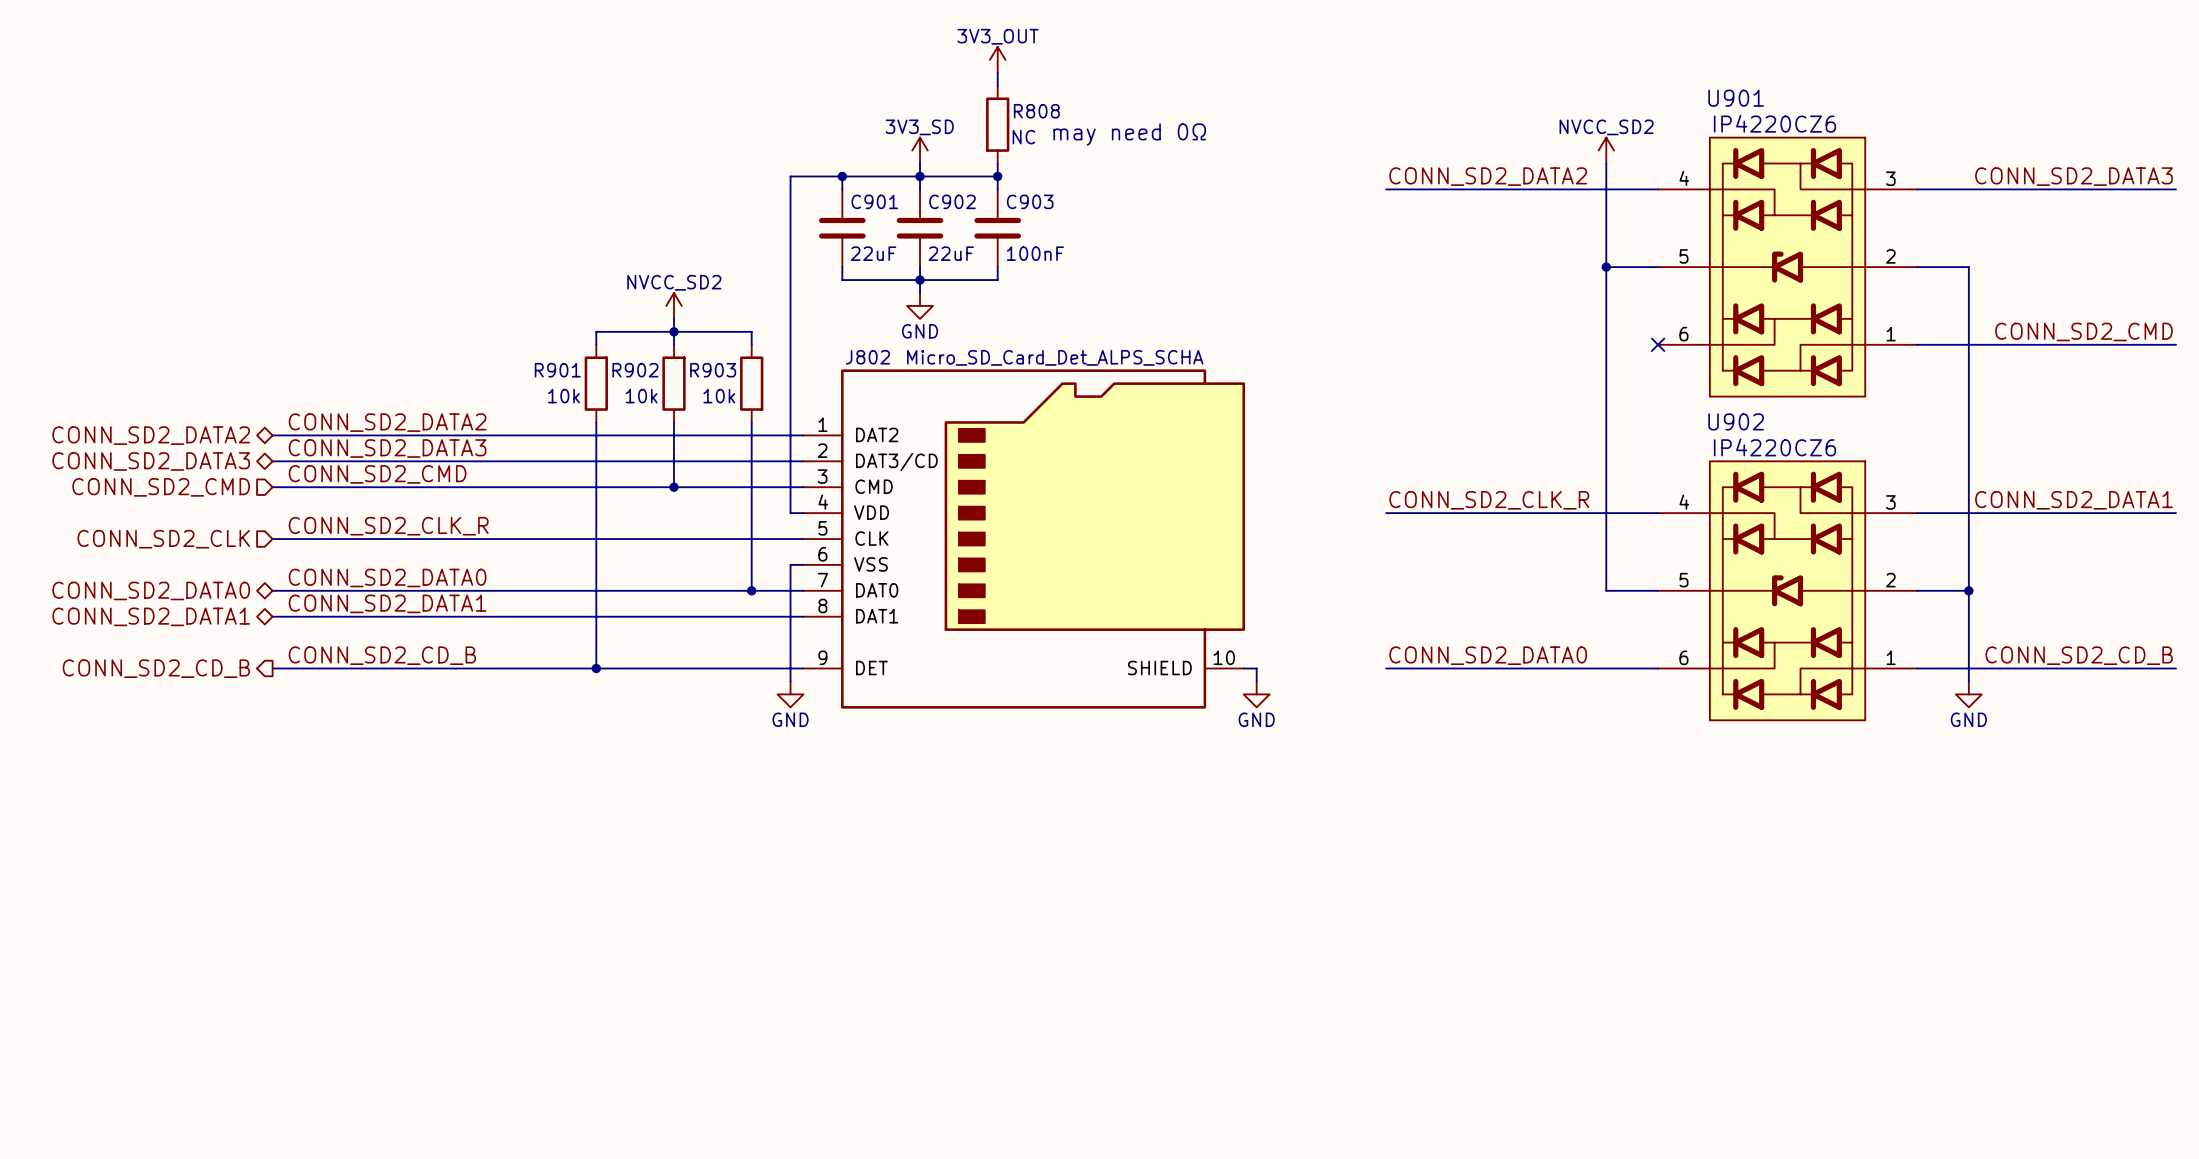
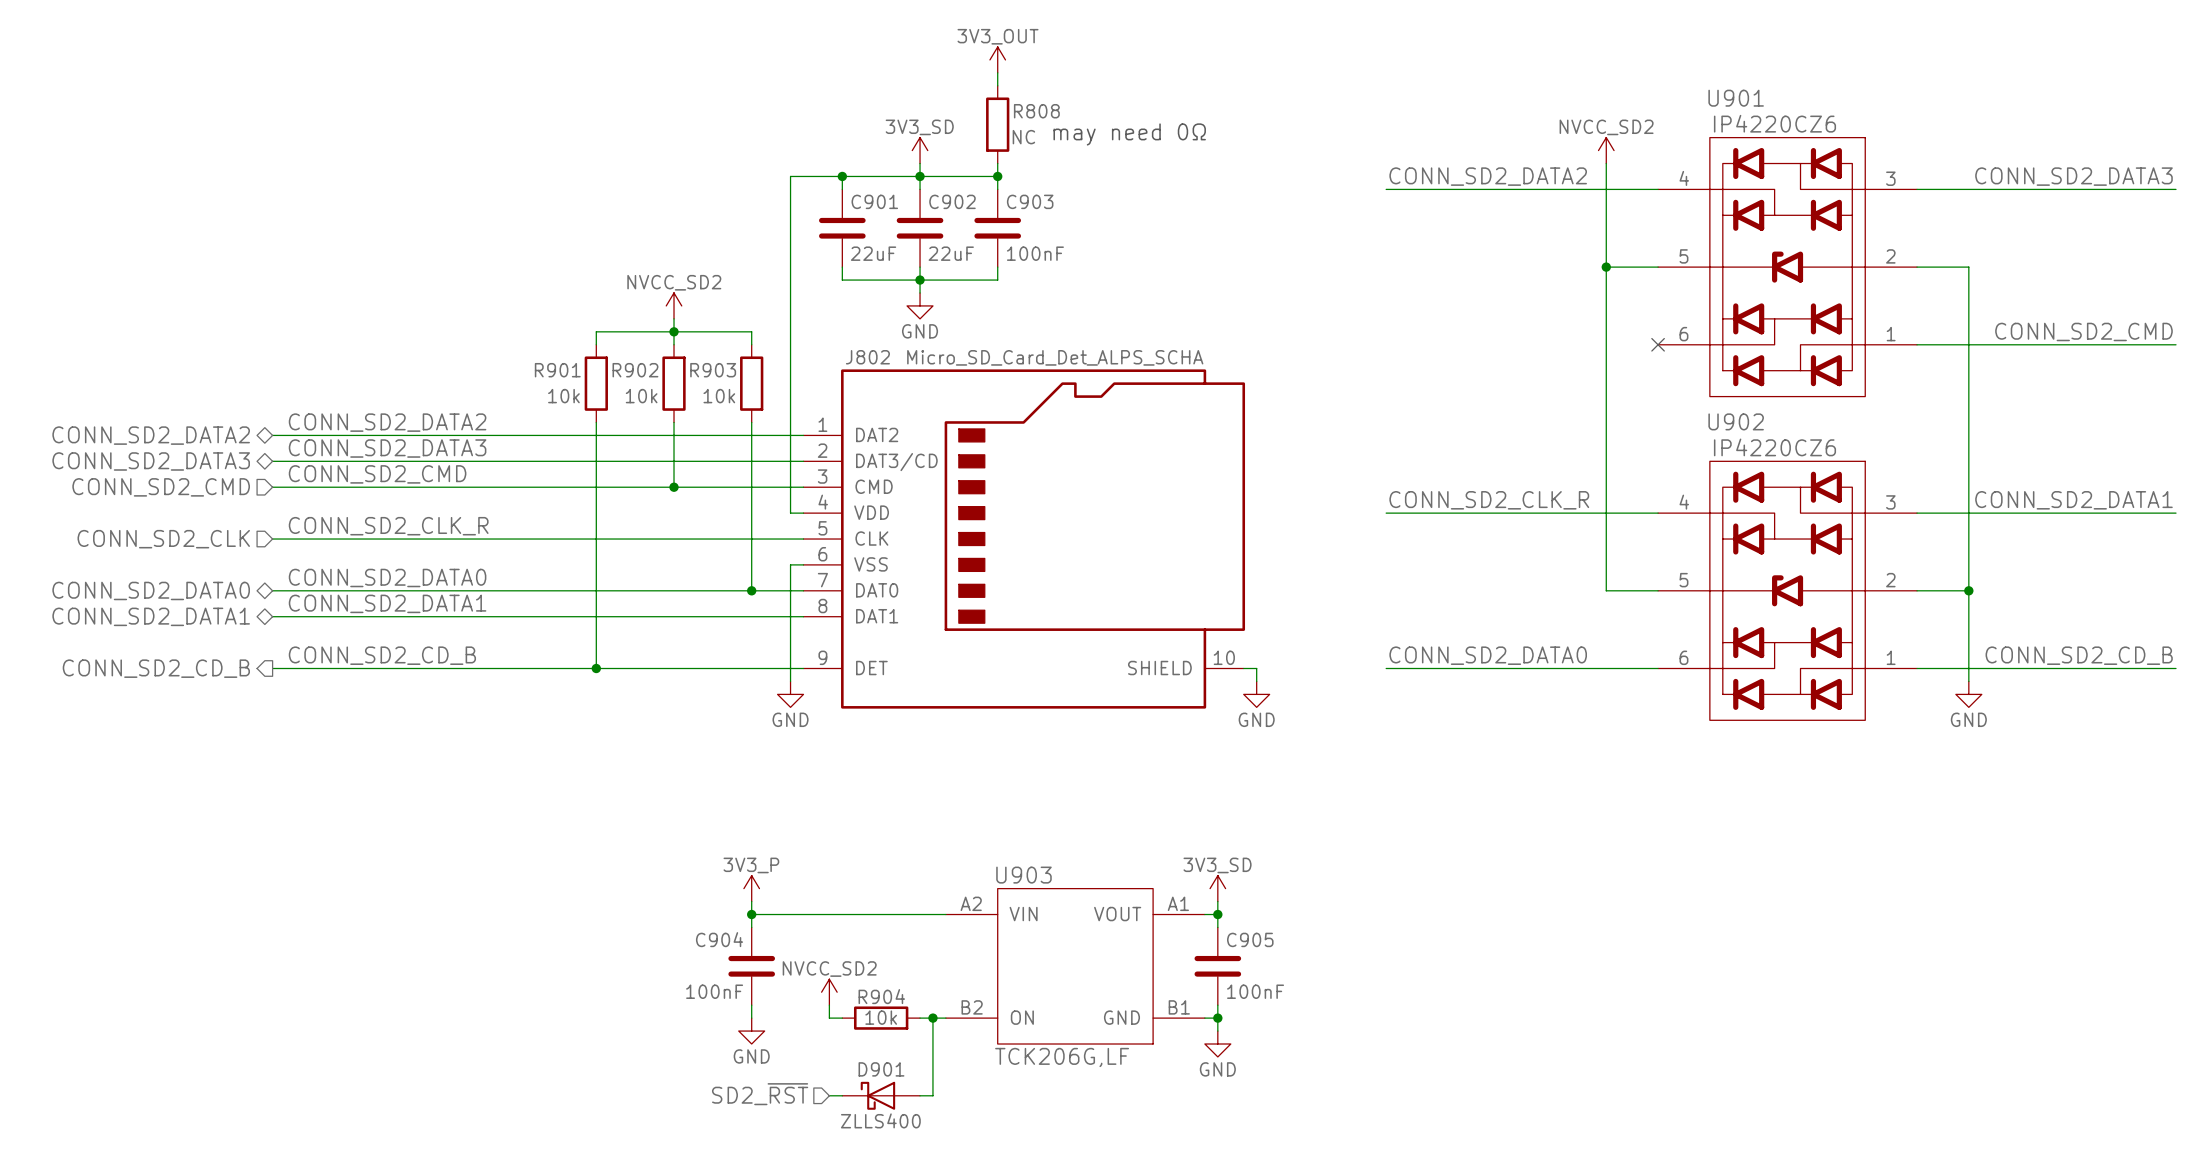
power symbol: none -> 3V3_P (751, 888)
power symbol: none -> 3V3_SD (1217, 888)
wire: none -> (751, 901) (751, 927)
wire: none -> (1217, 901) (1217, 927)
wire: none -> (751, 914) (945, 914)
junction: none -> (751, 914)
wire: none -> (1204, 914) (1217, 914)
junction: none -> (1217, 914)
C904: none -> 100nF (751, 966)
U903: none -> TCK206G,LF (1075, 966)
C905: none -> 100nF (1217, 966)
power symbol: none -> NVCC_SD2 (829, 992)
wire: none -> (751, 1005) (751, 1018)
wire: none -> (829, 1005) (829, 1018) (842, 1018)
wire: none -> (1217, 1005) (1217, 1031)
R904: none -> 10k (881, 1018)
wire: none -> (920, 1018) (945, 1018)
wire: none -> (932, 1018) (932, 1095) (920, 1095)
junction: none -> (932, 1018)
wire: none -> (1204, 1018) (1217, 1018)
junction: none -> (1217, 1018)
power symbol: none -> GND (751, 1031)
power symbol: none -> GND (1217, 1044)
hierarchical label: none -> SD2_~{RST} (760, 1094)
wire: none -> (829, 1095) (842, 1095)
D901: none -> ZLLS400 (881, 1095)

